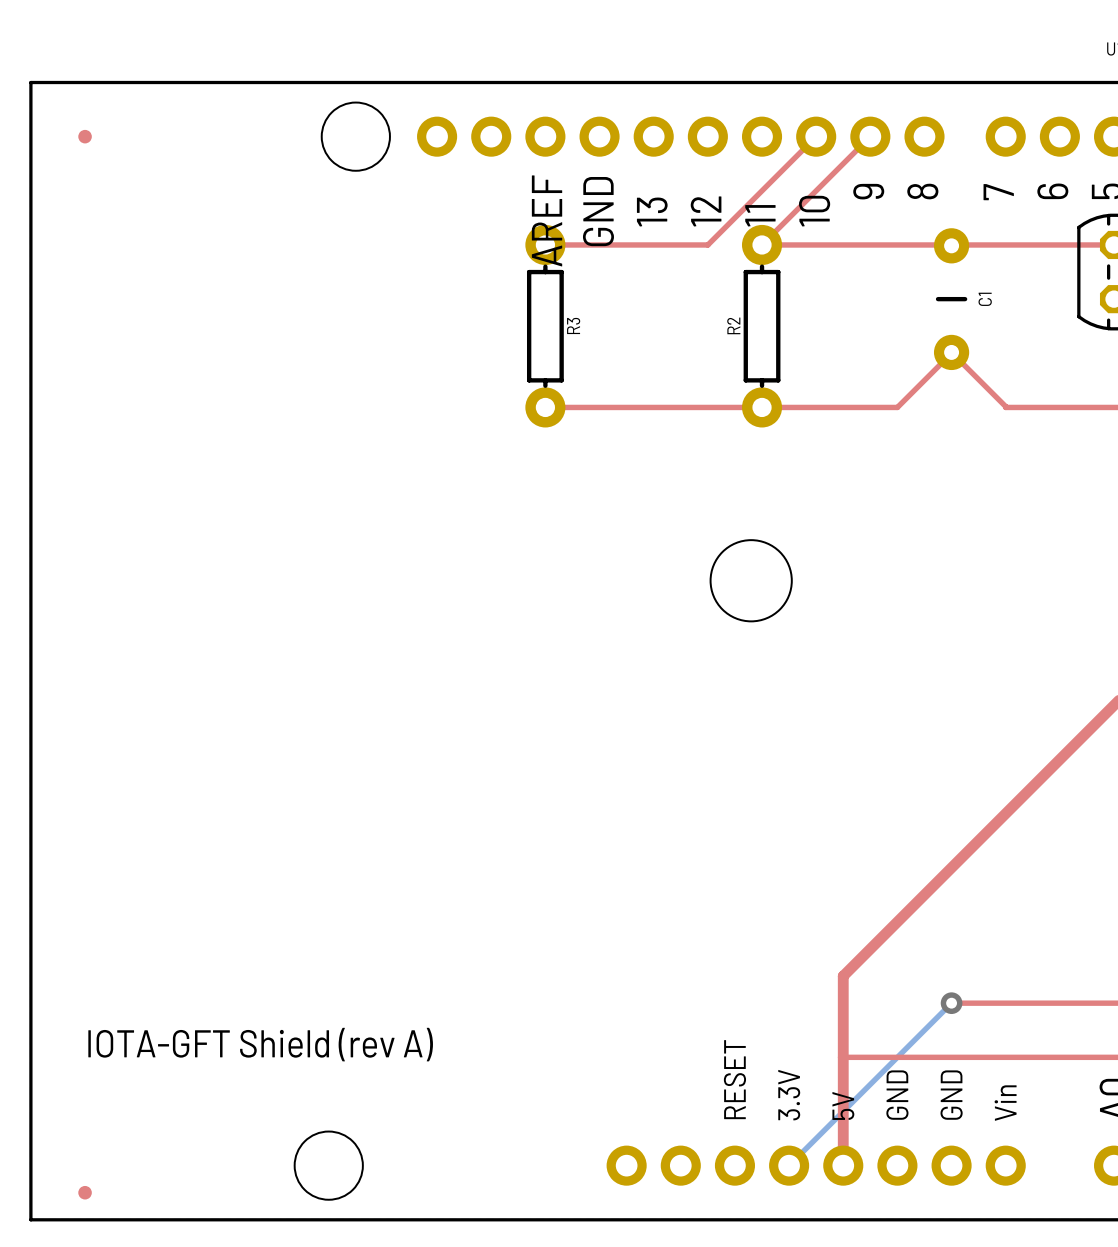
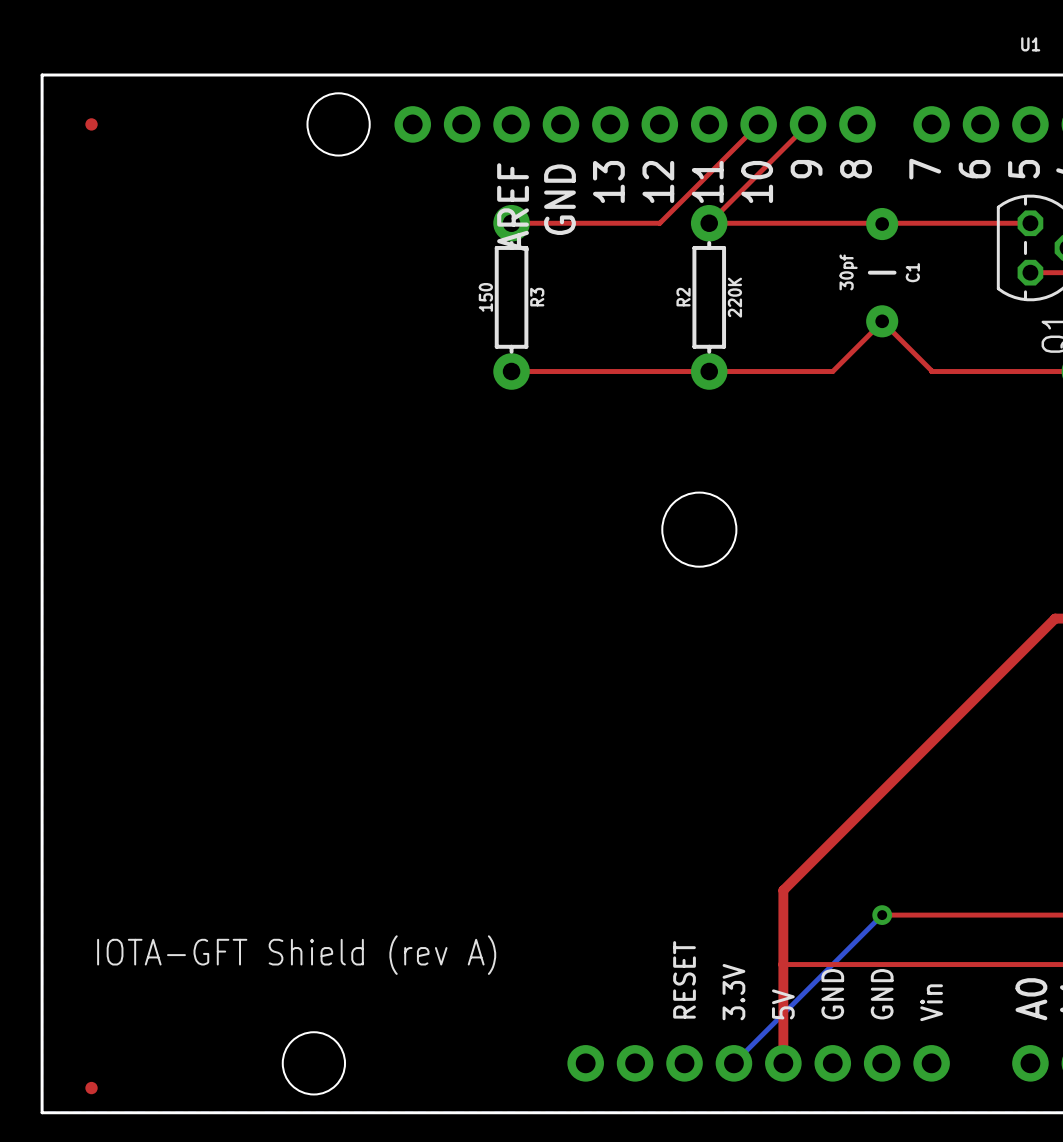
C1 value: none -> 30pf (848, 272)
R2 value: none -> 220K (734, 297)
R3 value: none -> 150 (485, 297)

